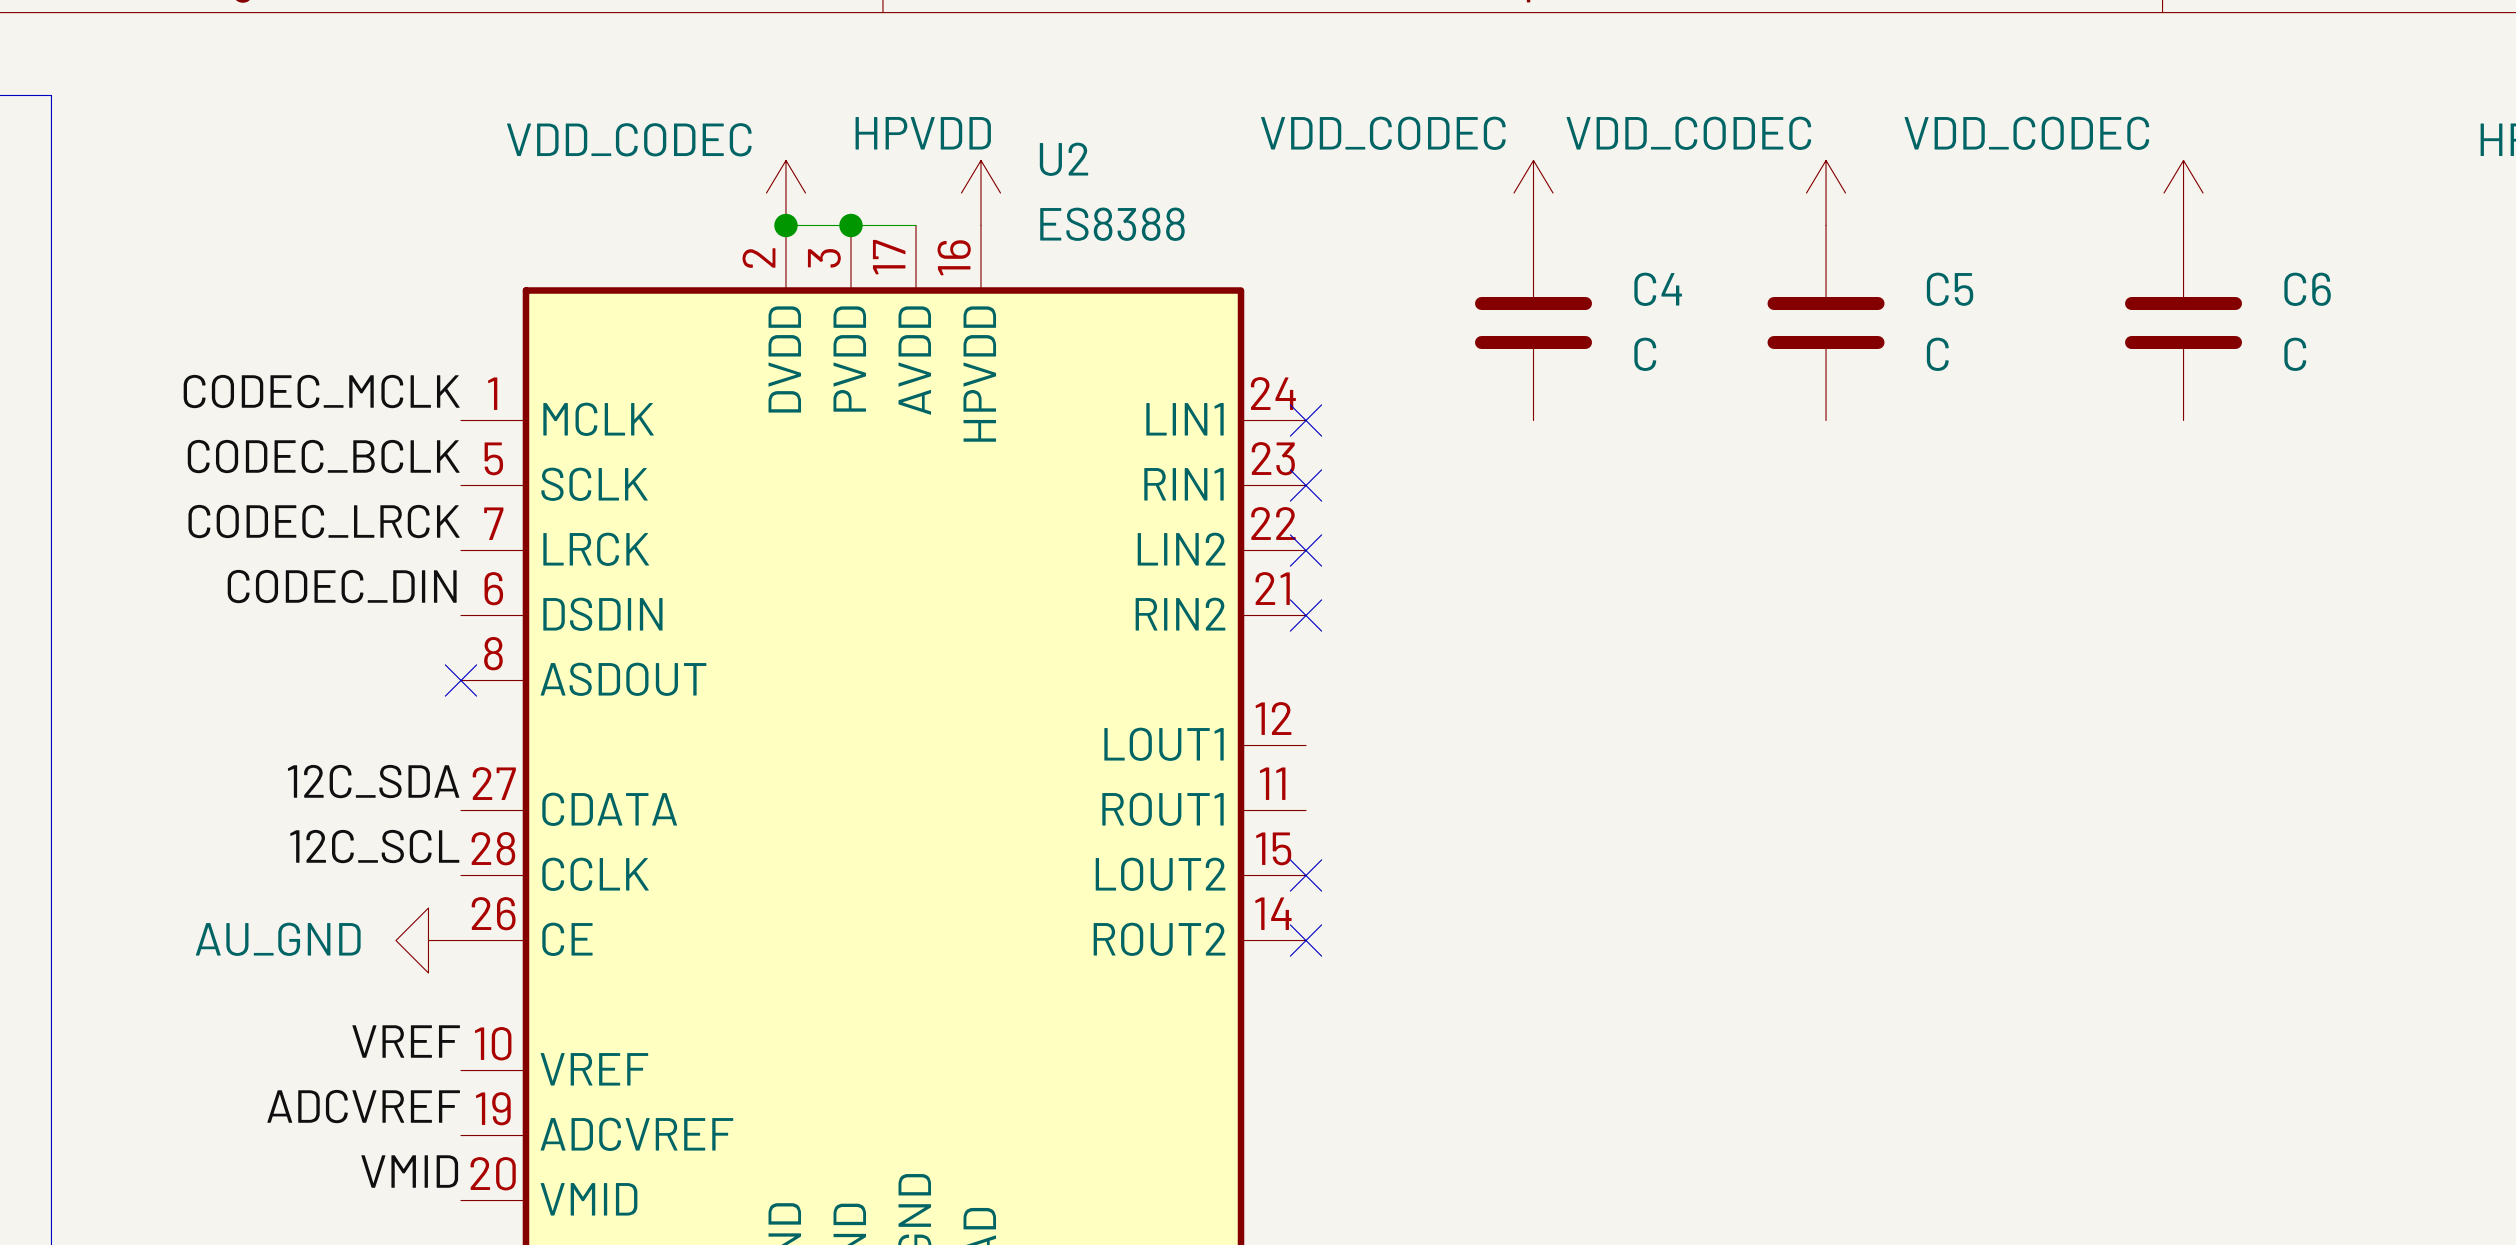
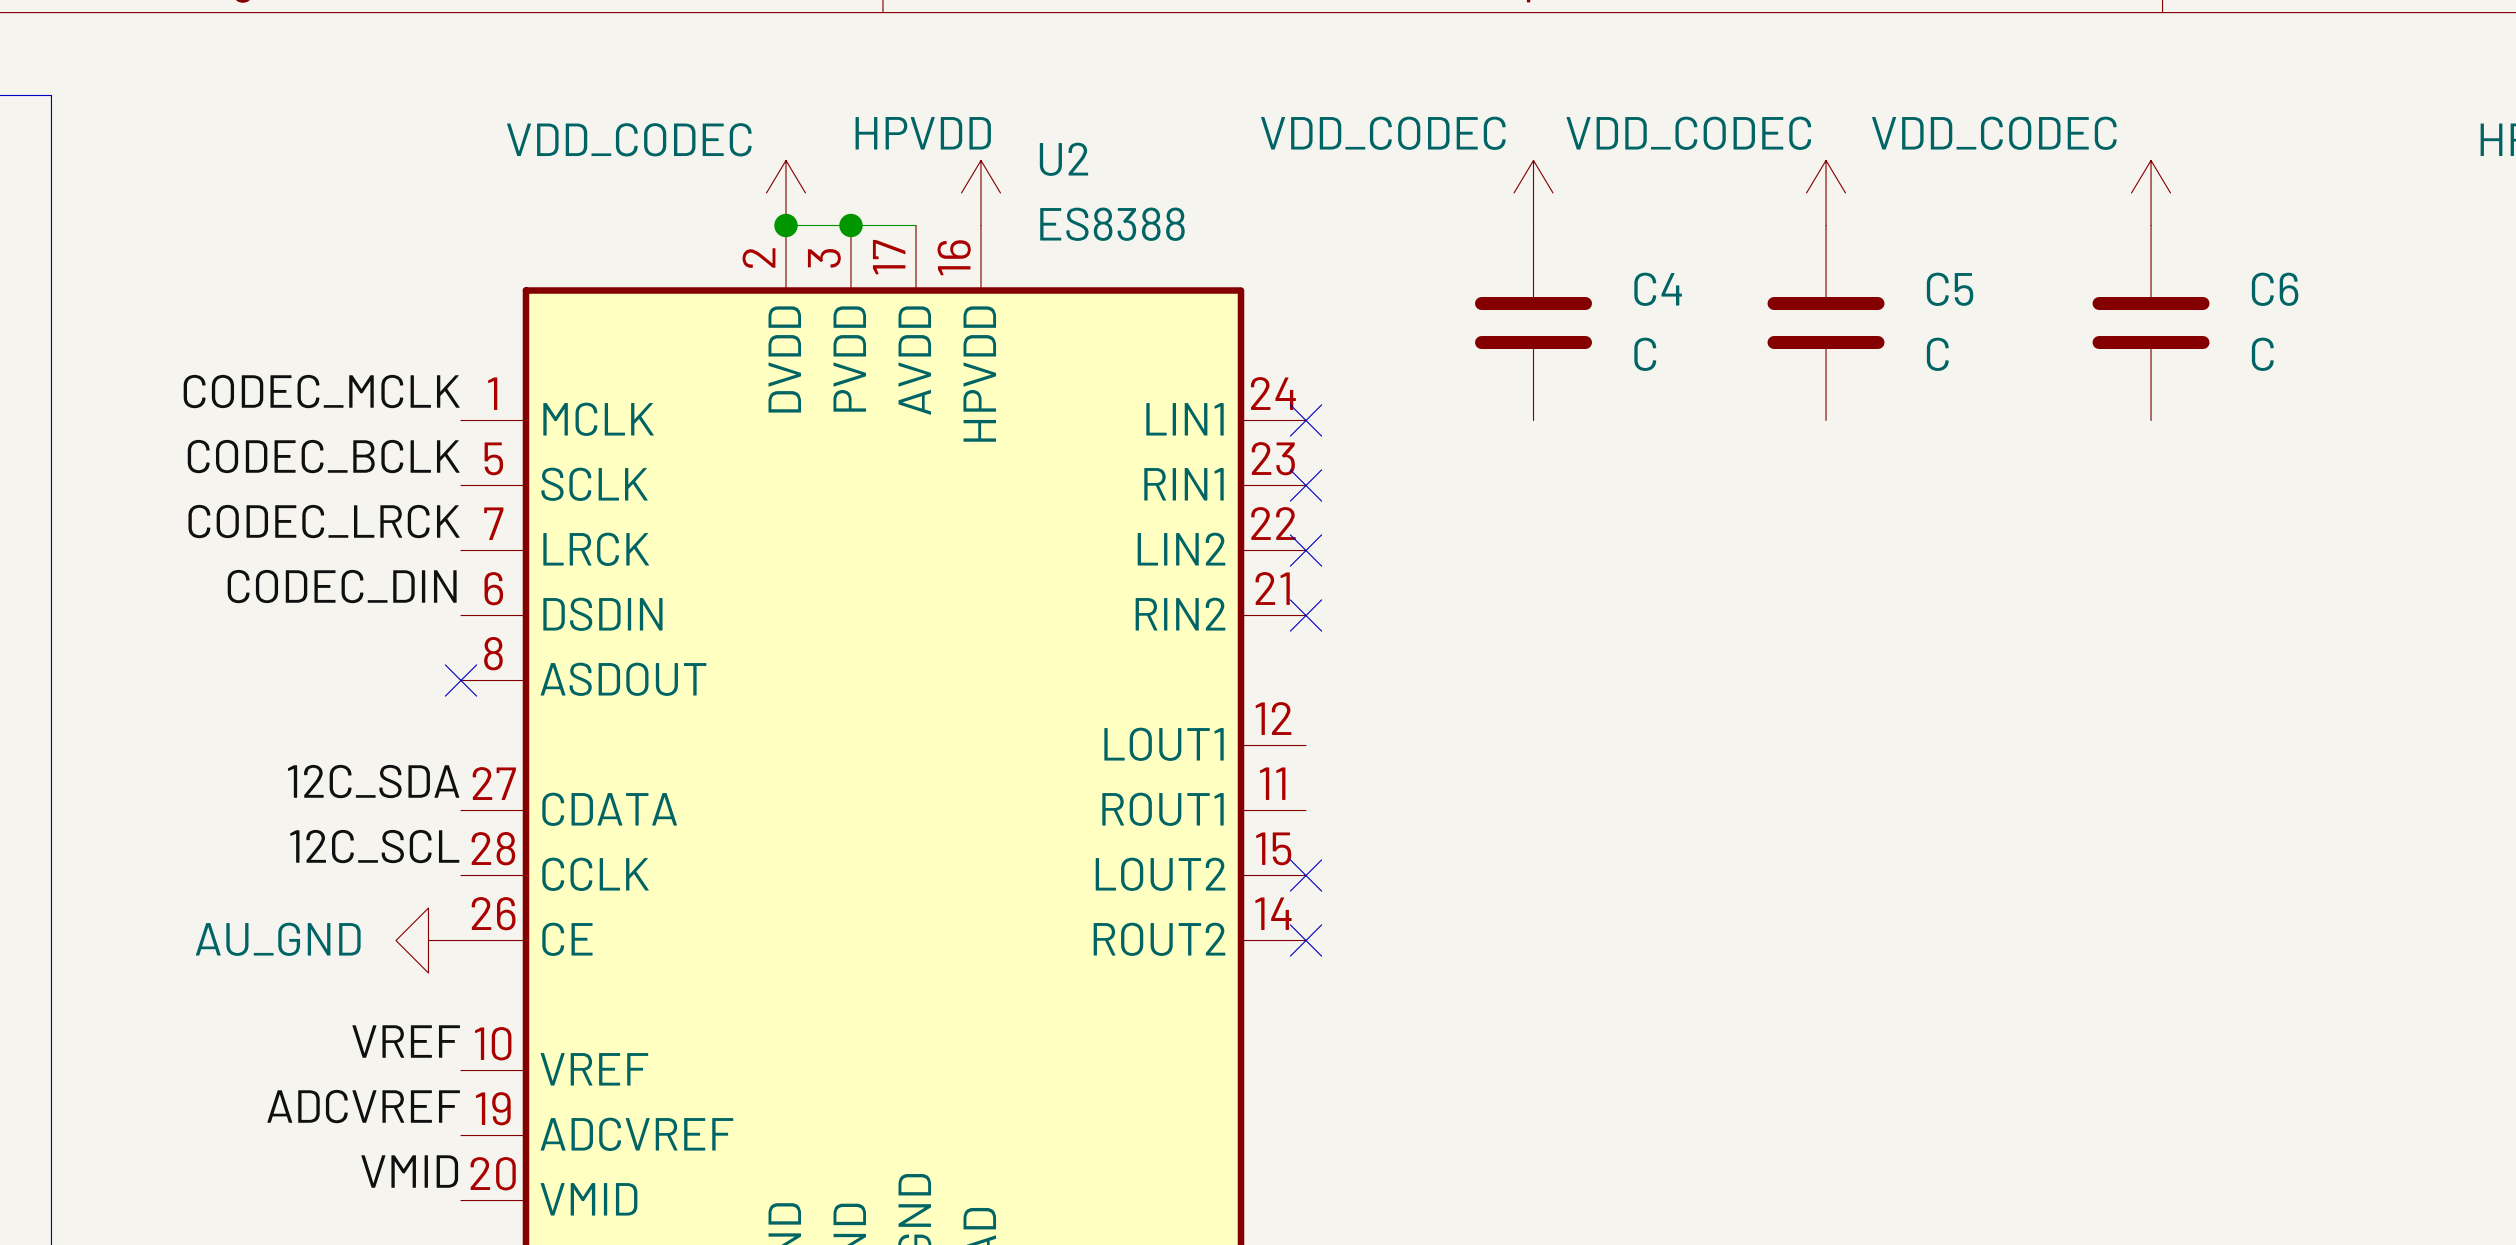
power symbol position: VDD_CODEC (2183, 193) -> VDD_CODEC (2151, 193)
C6 position: (2183, 323) -> (2151, 323)

